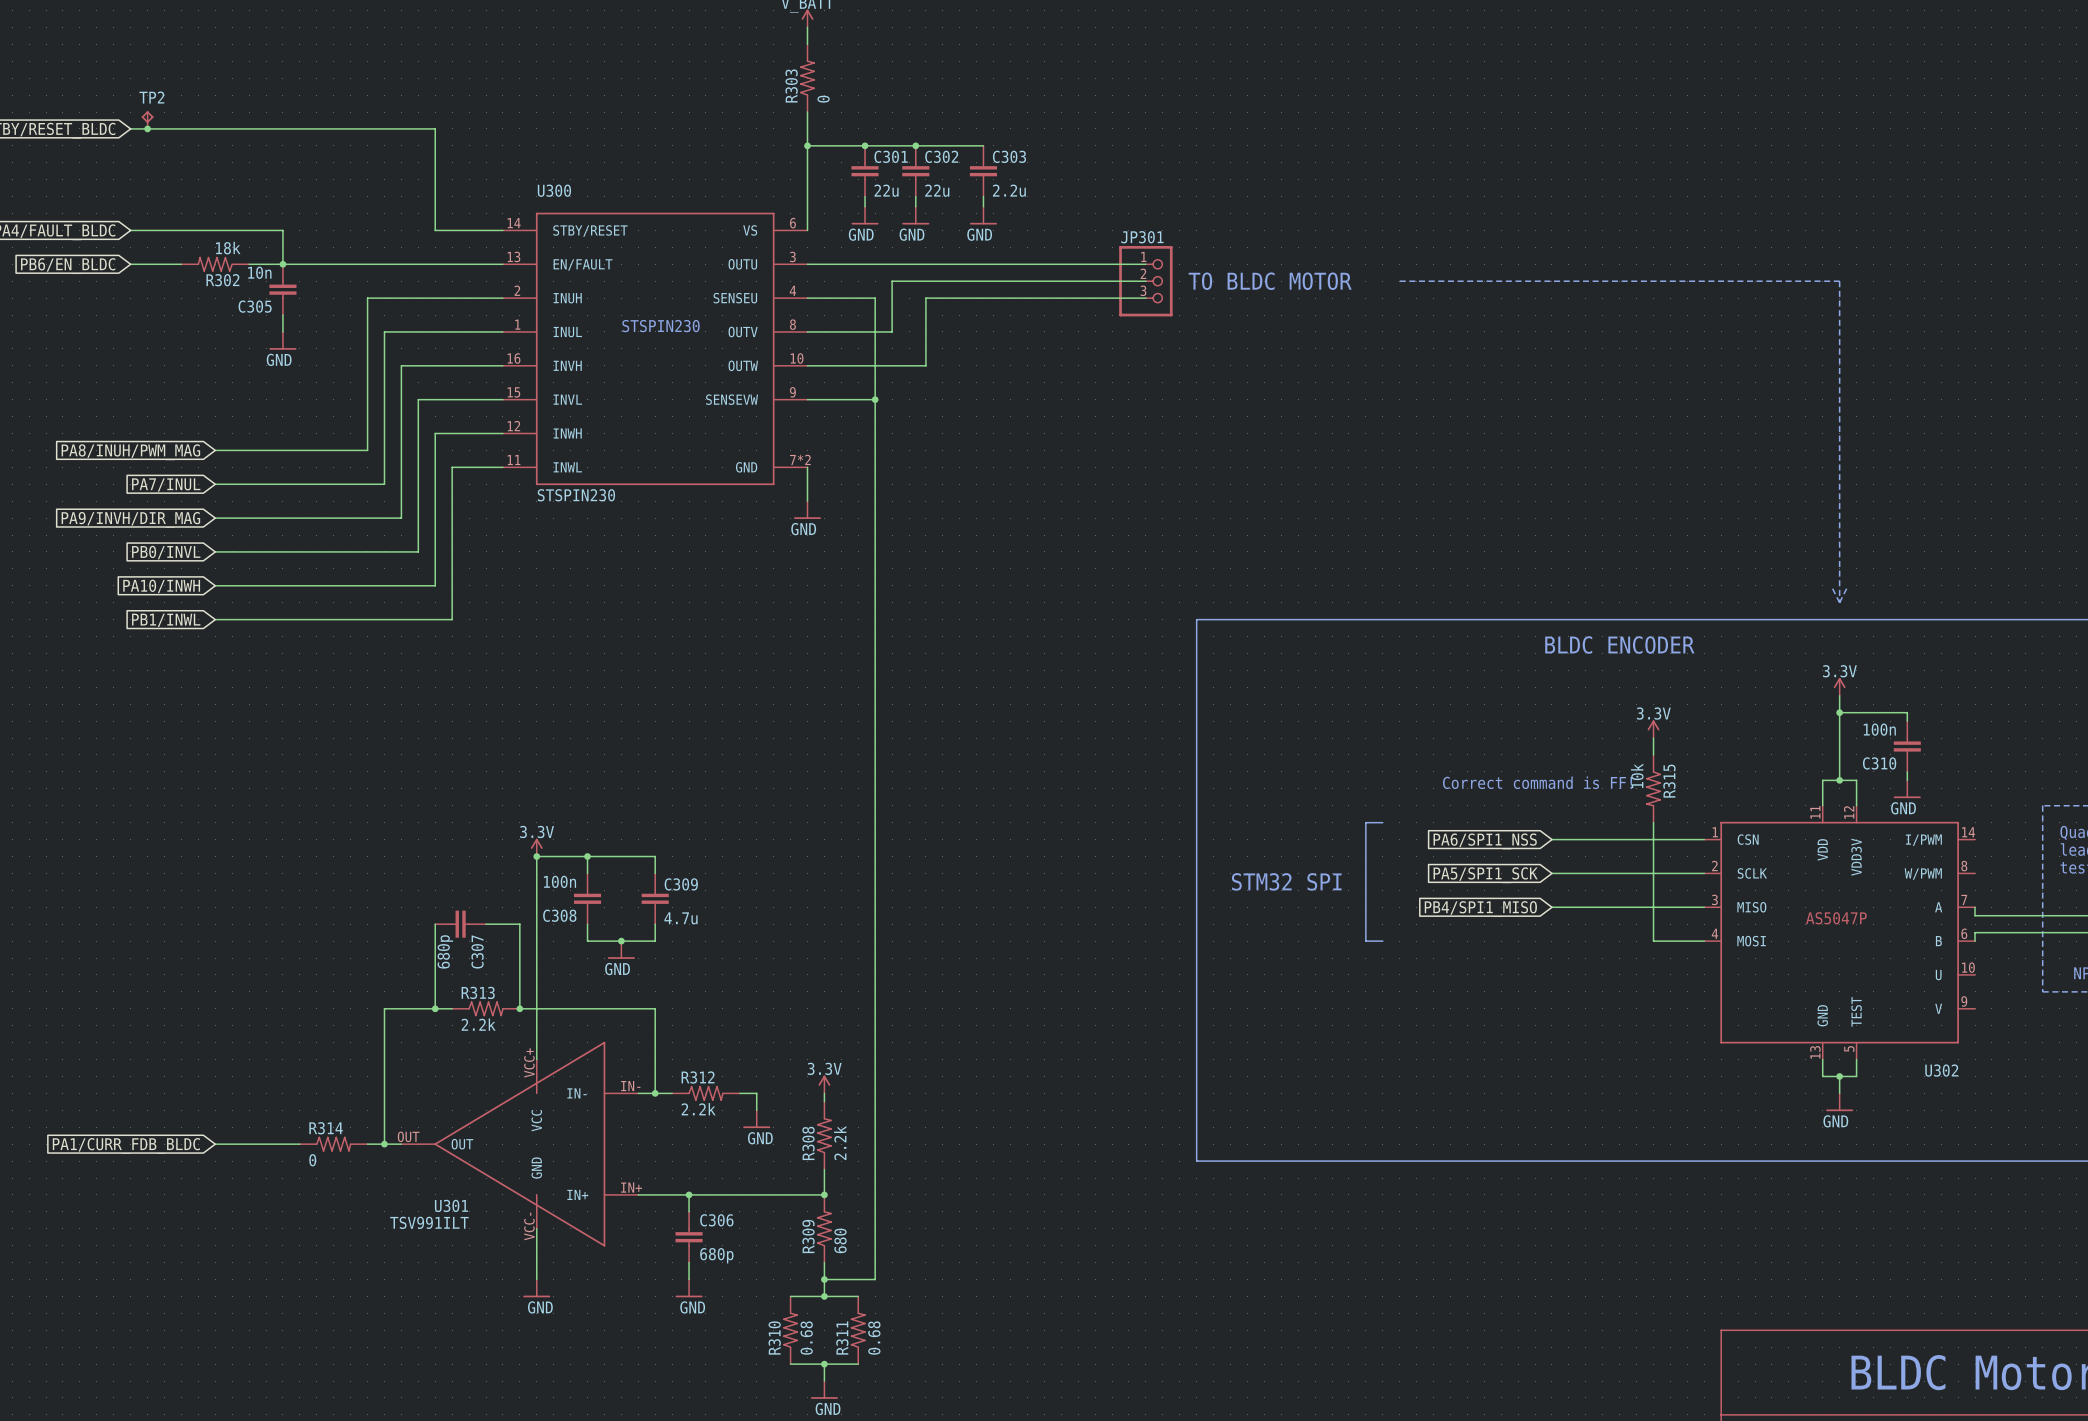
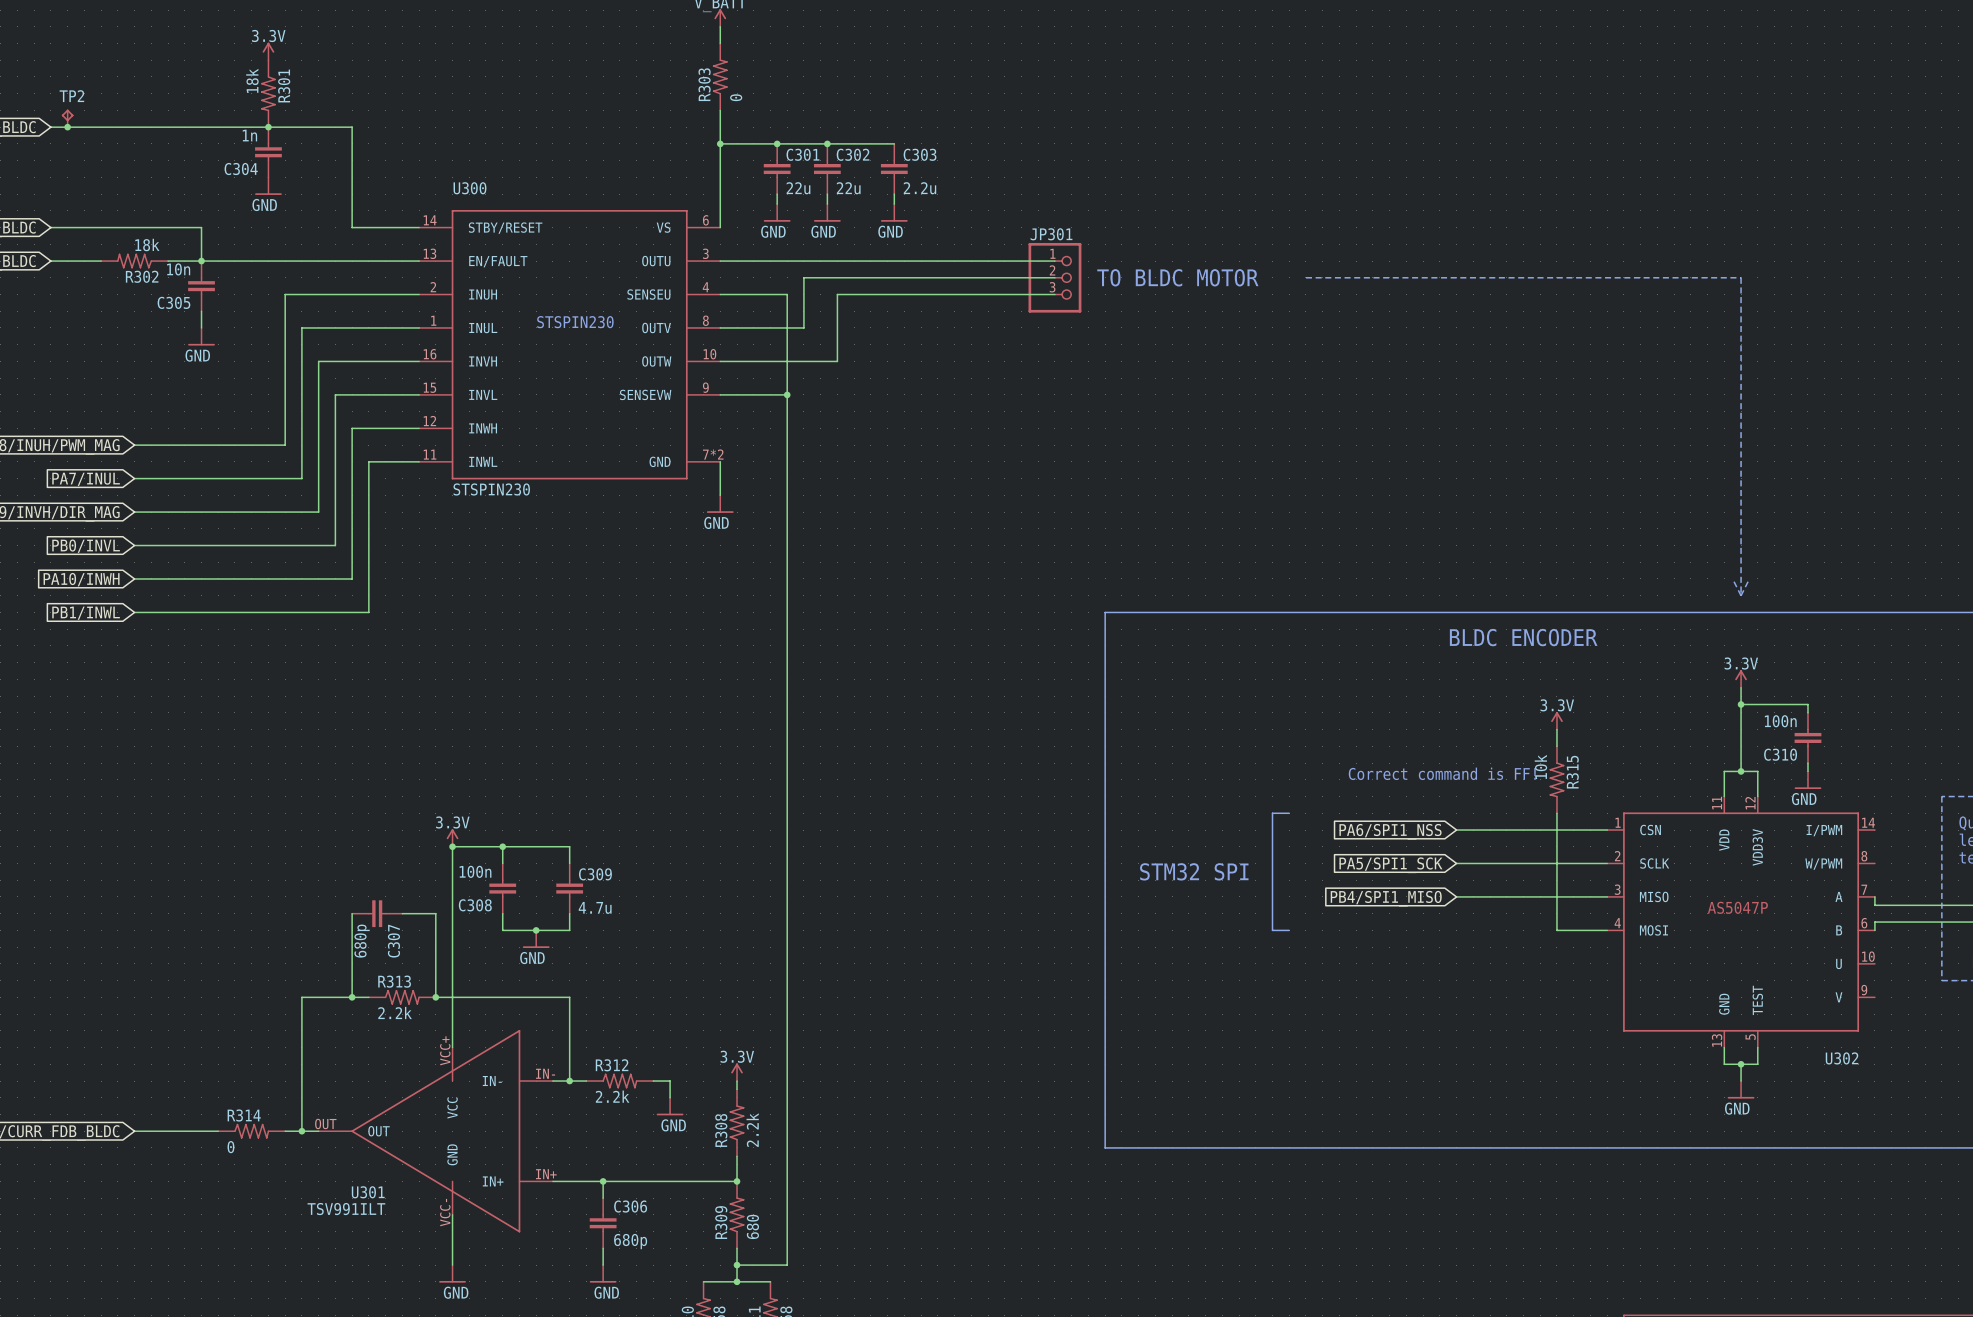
power symbol: none -> 3.3V (268, 51)
R301: none -> 18k (268, 93)
junction: none -> (268, 127)
C304: none -> 1n (268, 152)
power symbol: none -> GND (268, 186)

